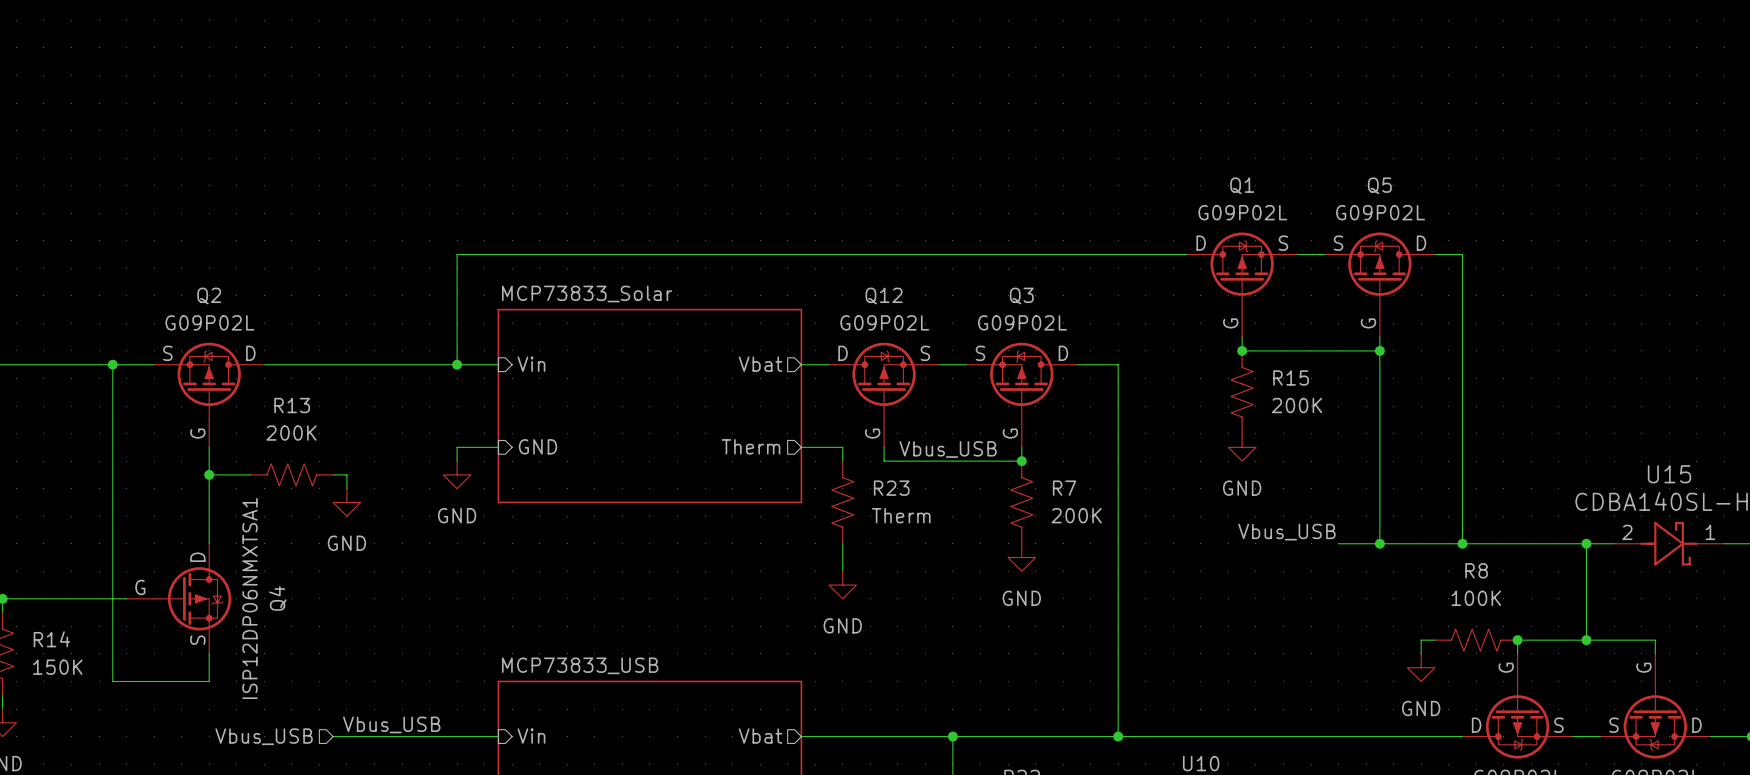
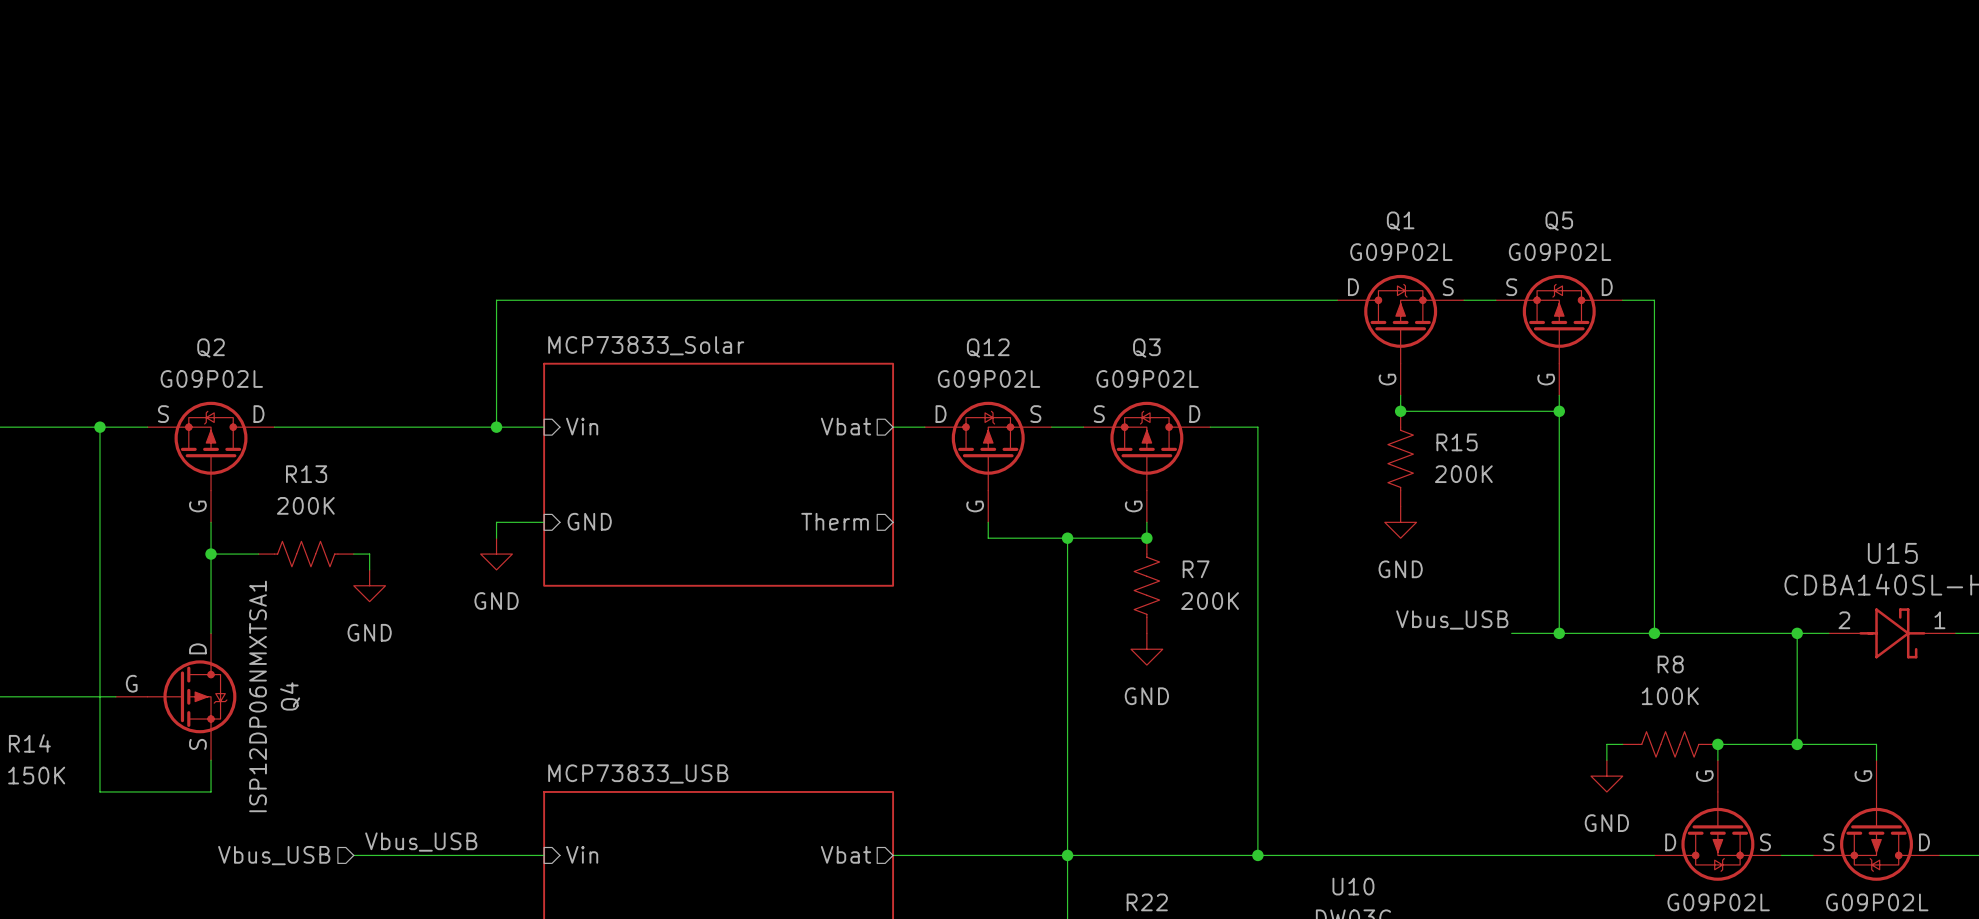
wire: (801, 447) (842, 447) (842, 461) -> none
label: Vbus_USB (948, 449) -> none
wire: none -> (1067, 538) (1067, 855)
junction: none -> (1067, 538)
R23: Therm (842, 502) -> none
wire: (842, 543) (842, 571) -> none
power symbol: GND (842, 585) -> none

